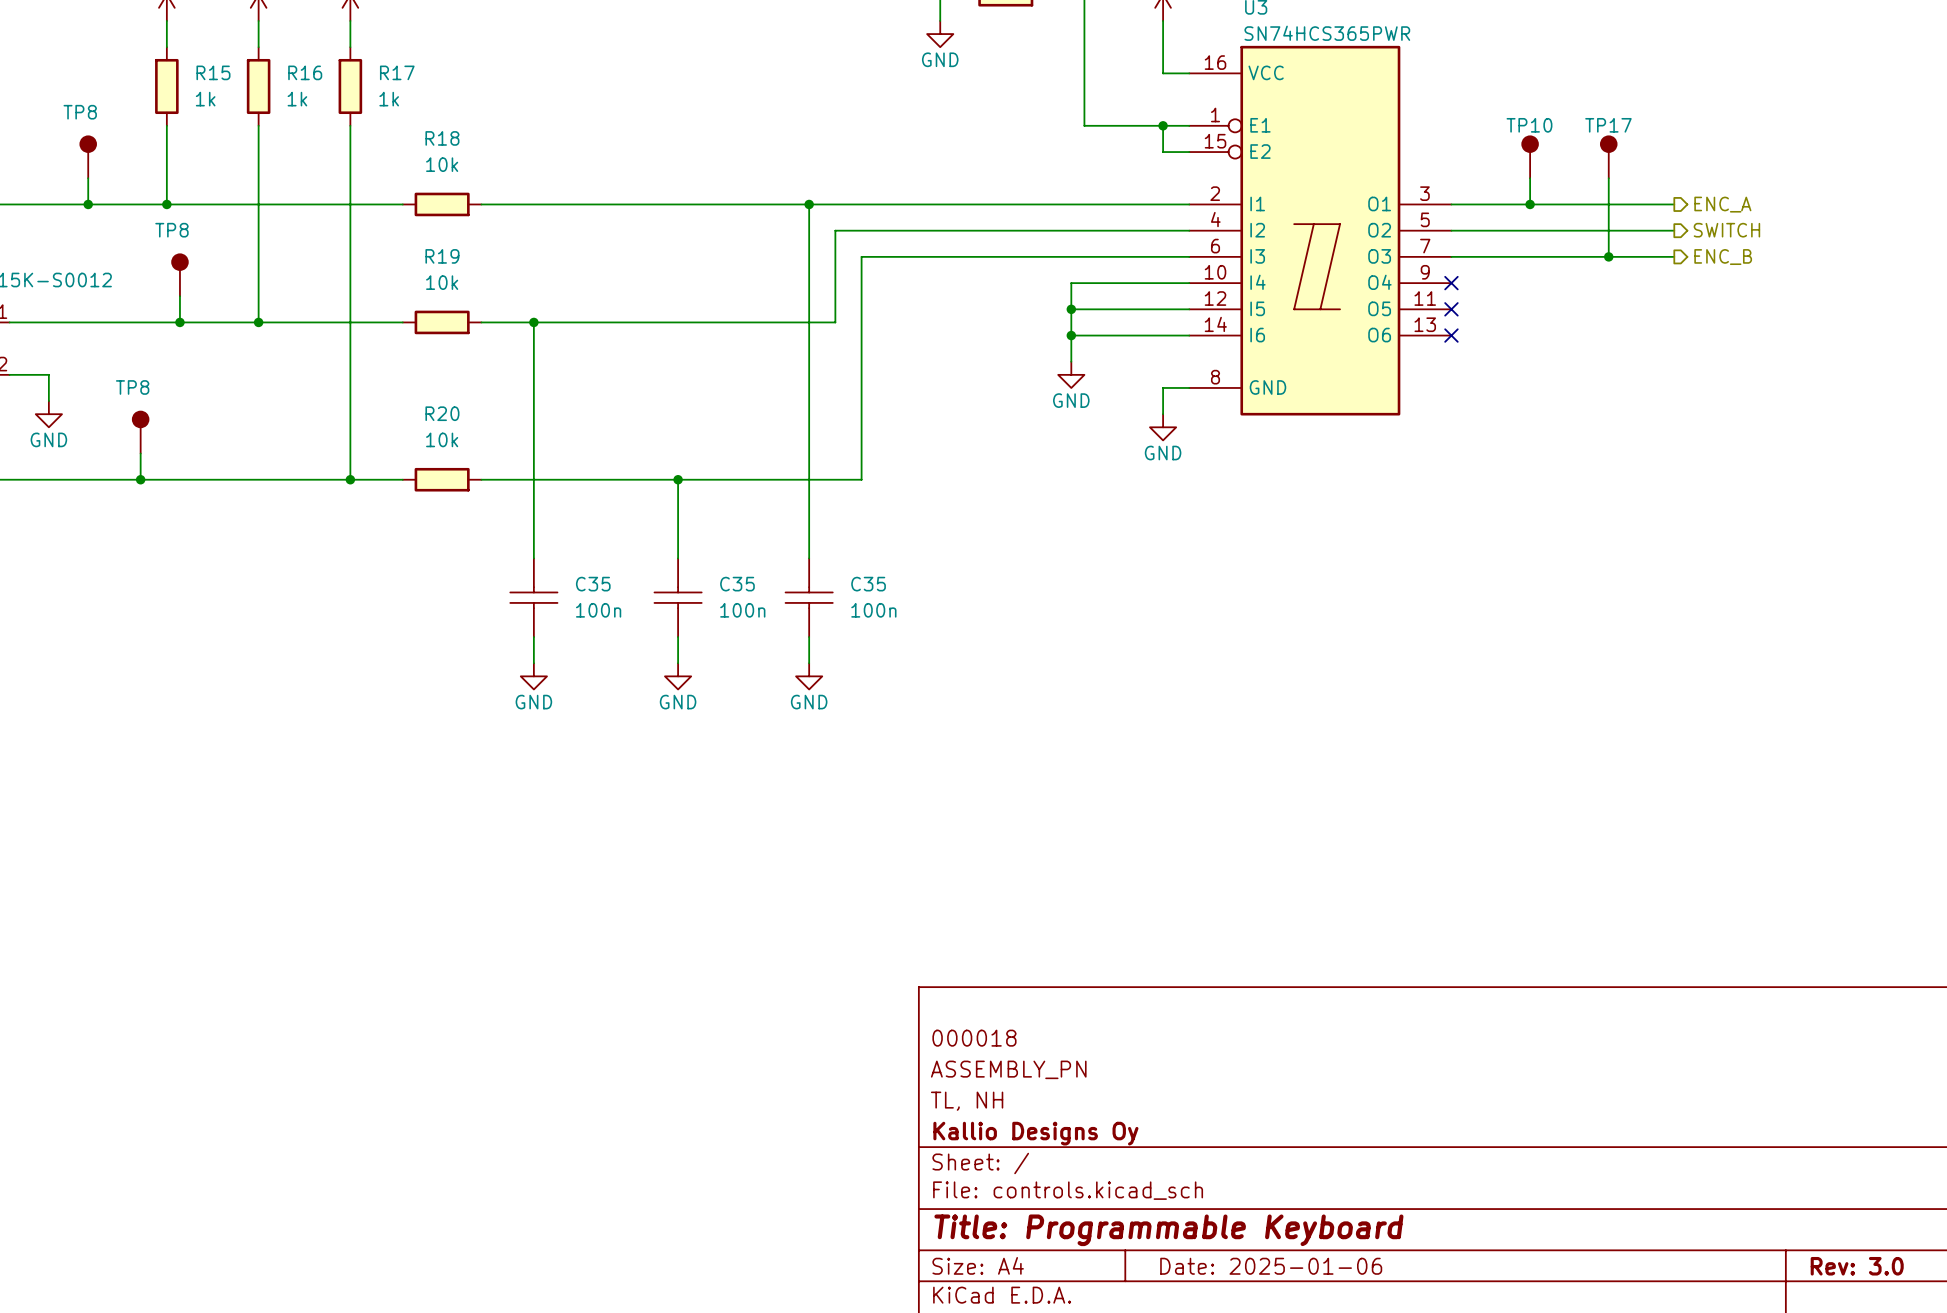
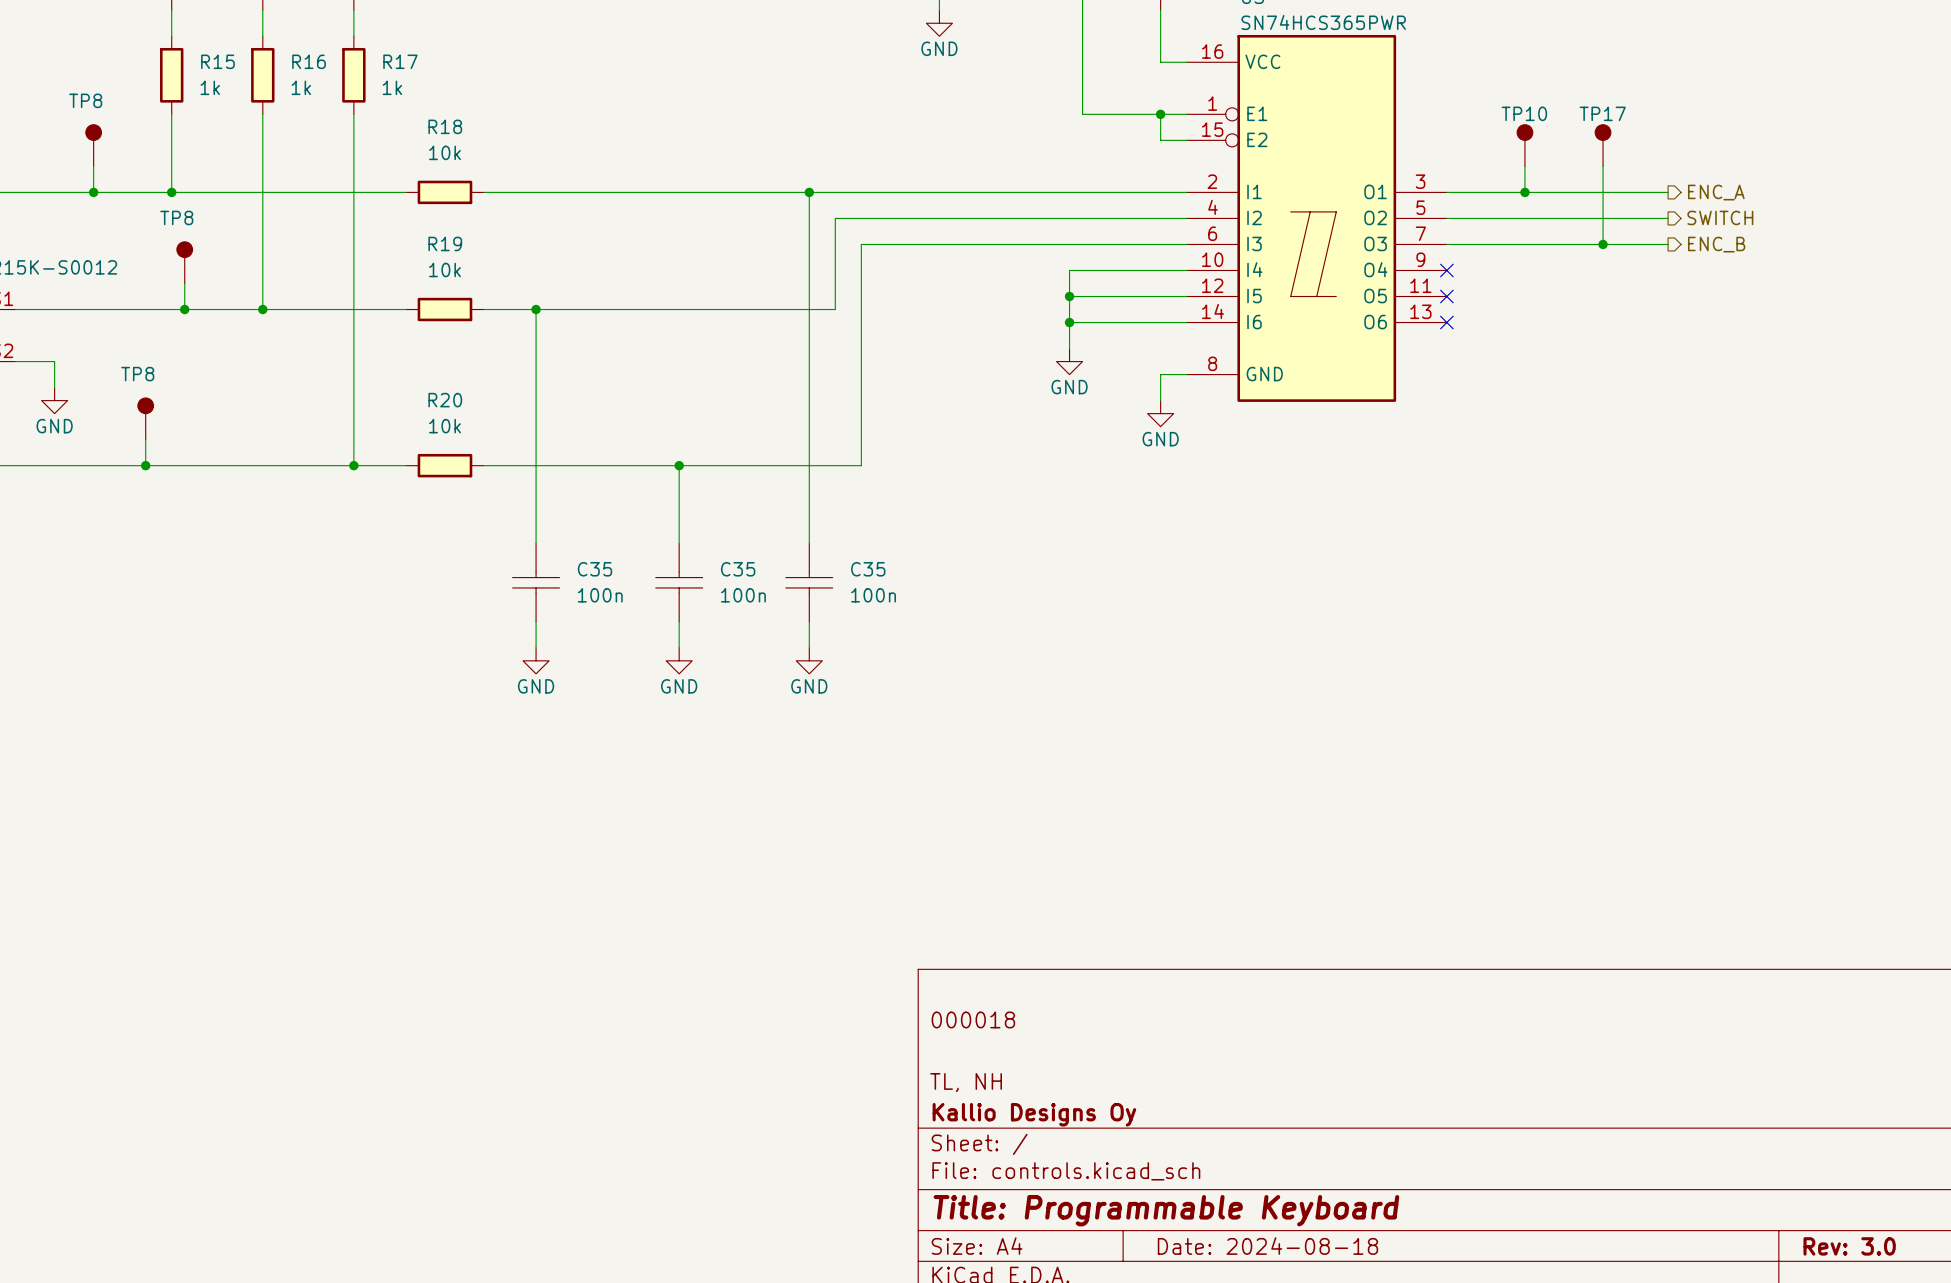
title block: ASSEMBLY_PN (1008, 1069) -> none
title block: Date: 2025-01-06 (1271, 1266) -> Date: 2024-08-18 (1267, 1246)

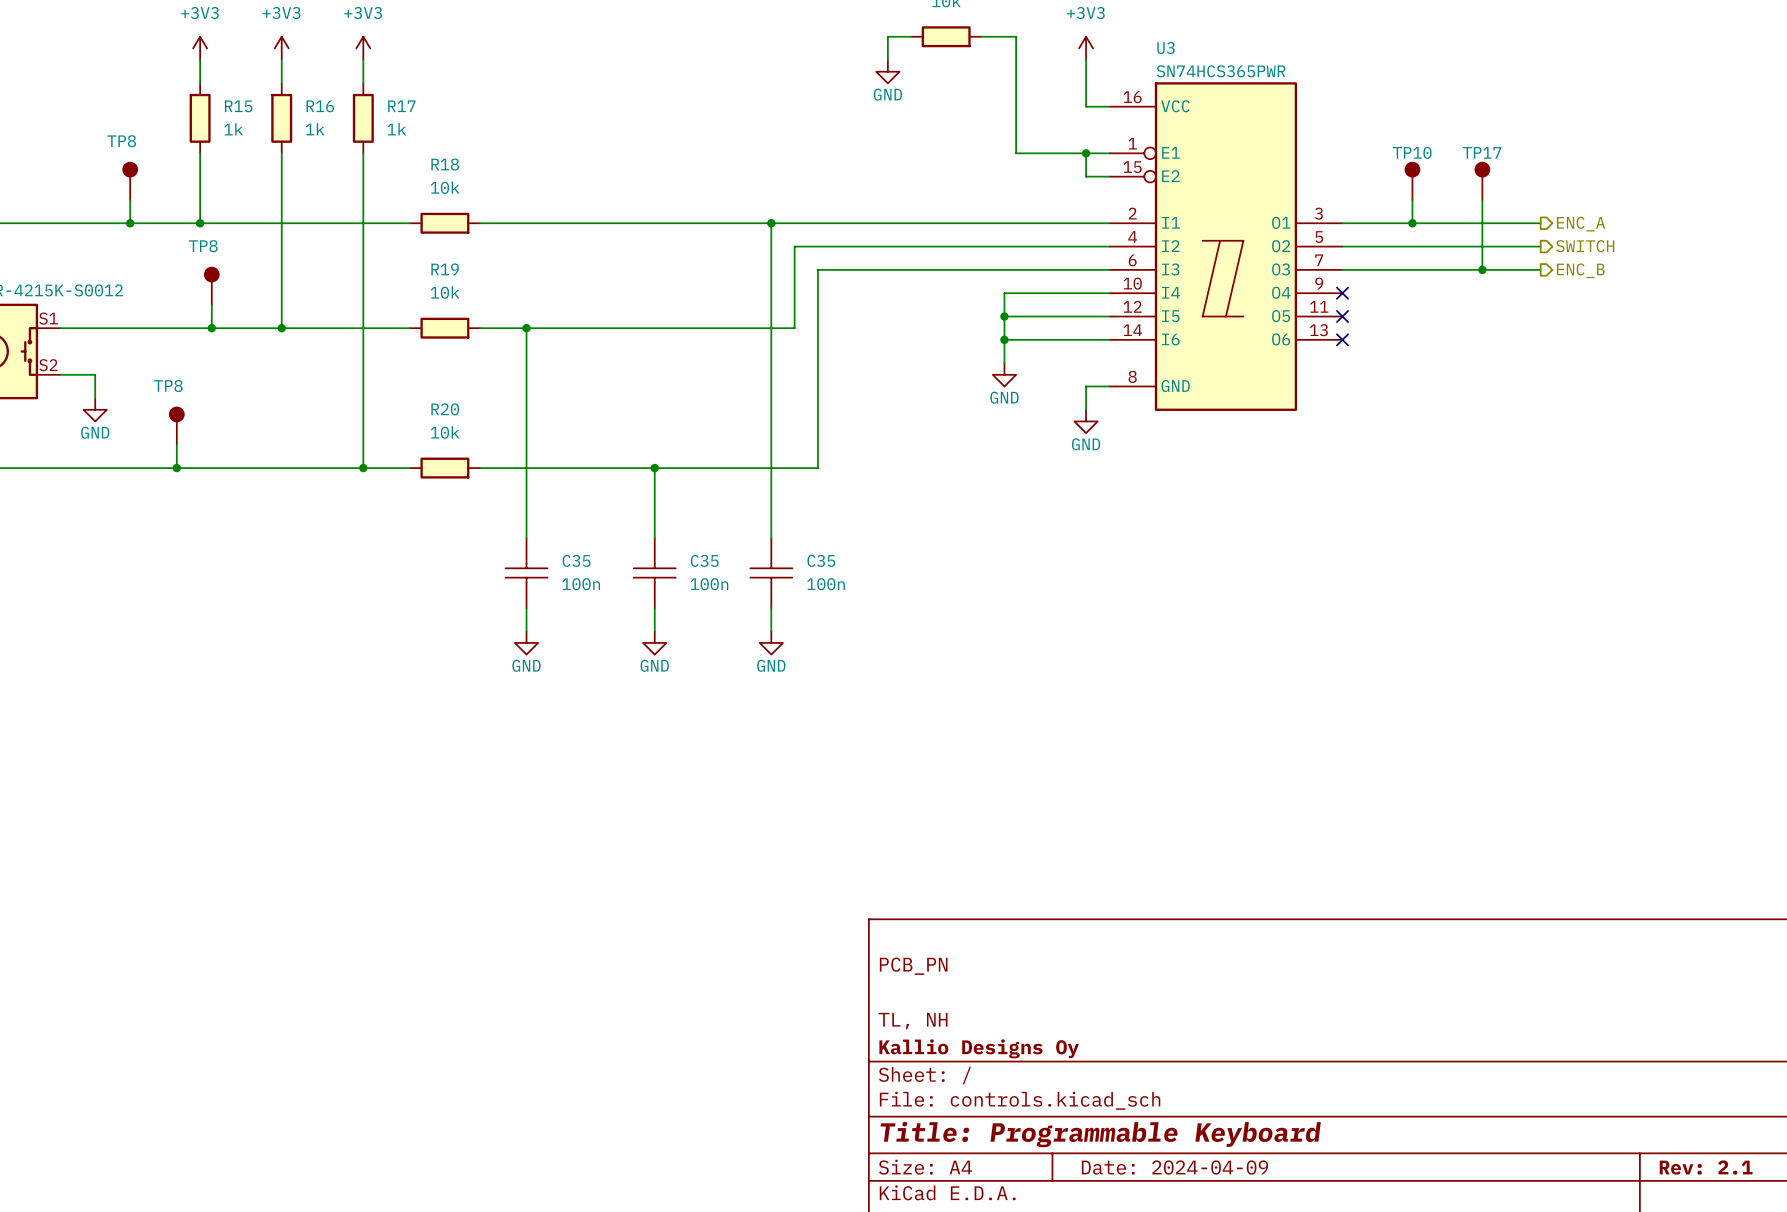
title block: 000018 (973, 1019) -> PCB_PN (913, 966)
title block: Date: 2024-08-18 (1267, 1246) -> Date: 2024-04-09 (1174, 1167)
title block: Rev: 3.0 (1849, 1246) -> Rev: 2.1 (1706, 1167)

